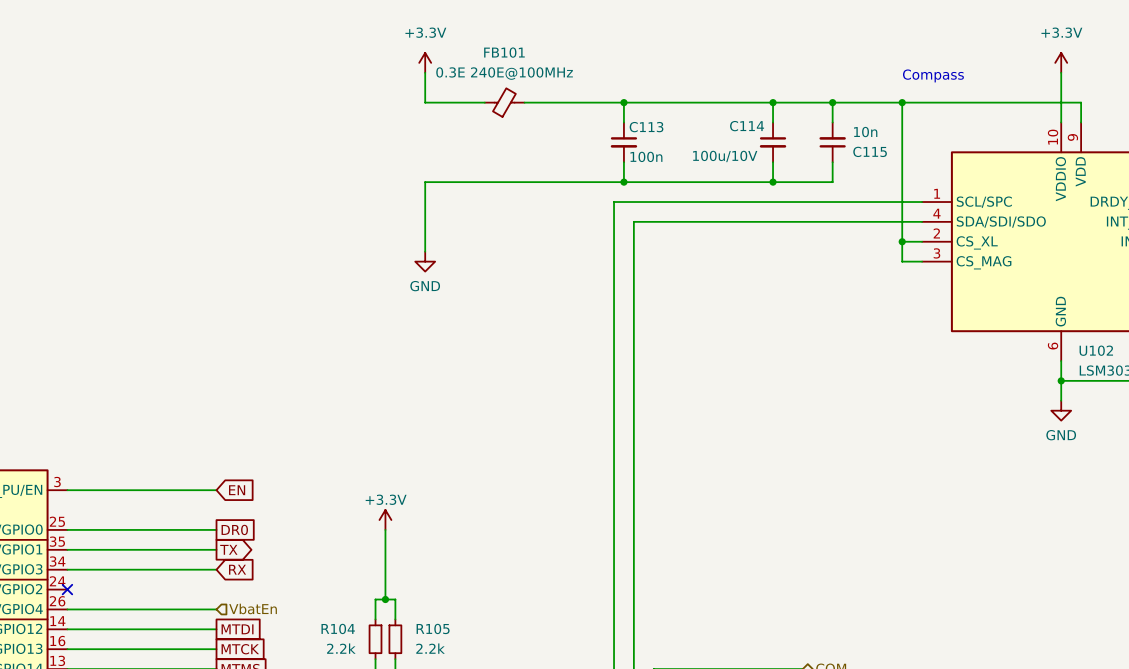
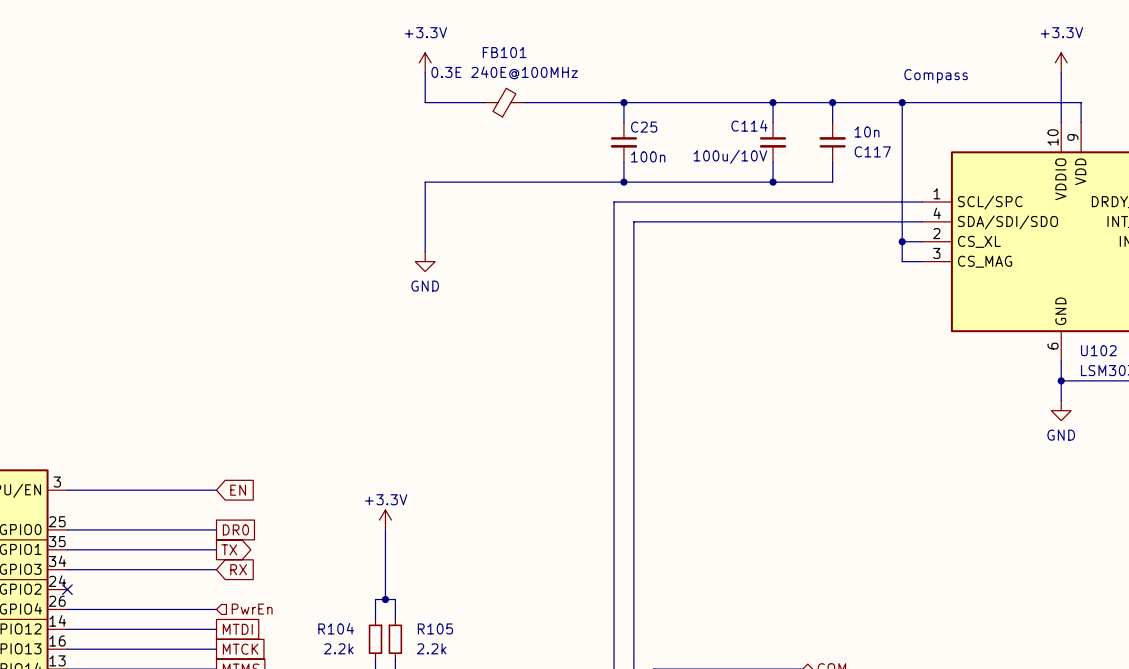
C113 name: C113 (646, 127) -> C25 (644, 127)
C115 name: C115 (870, 151) -> C117 (872, 151)
hierarchical label: VbatEn (253, 608) -> PwrEn (252, 609)

